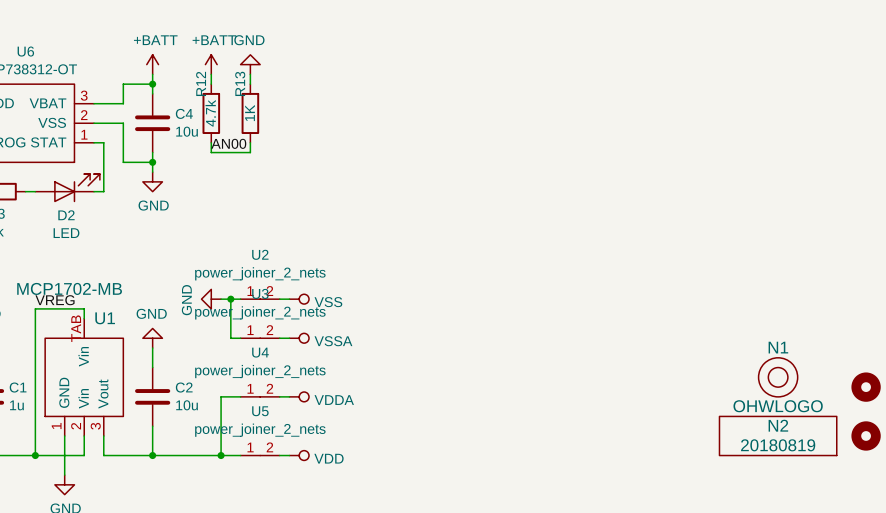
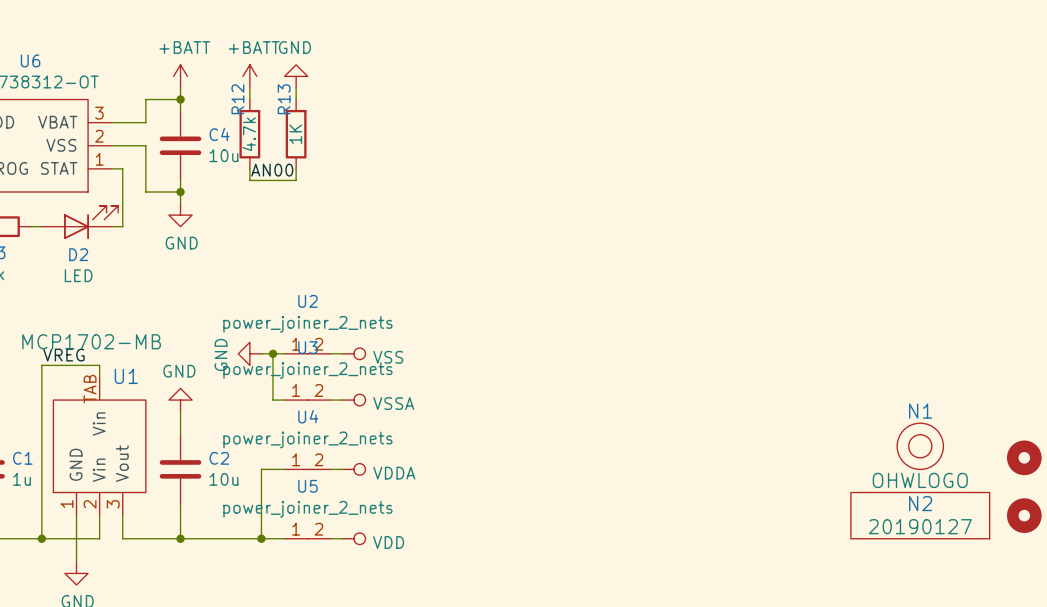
N2 value: 20180819 (778, 445) -> 20190127 (920, 526)

